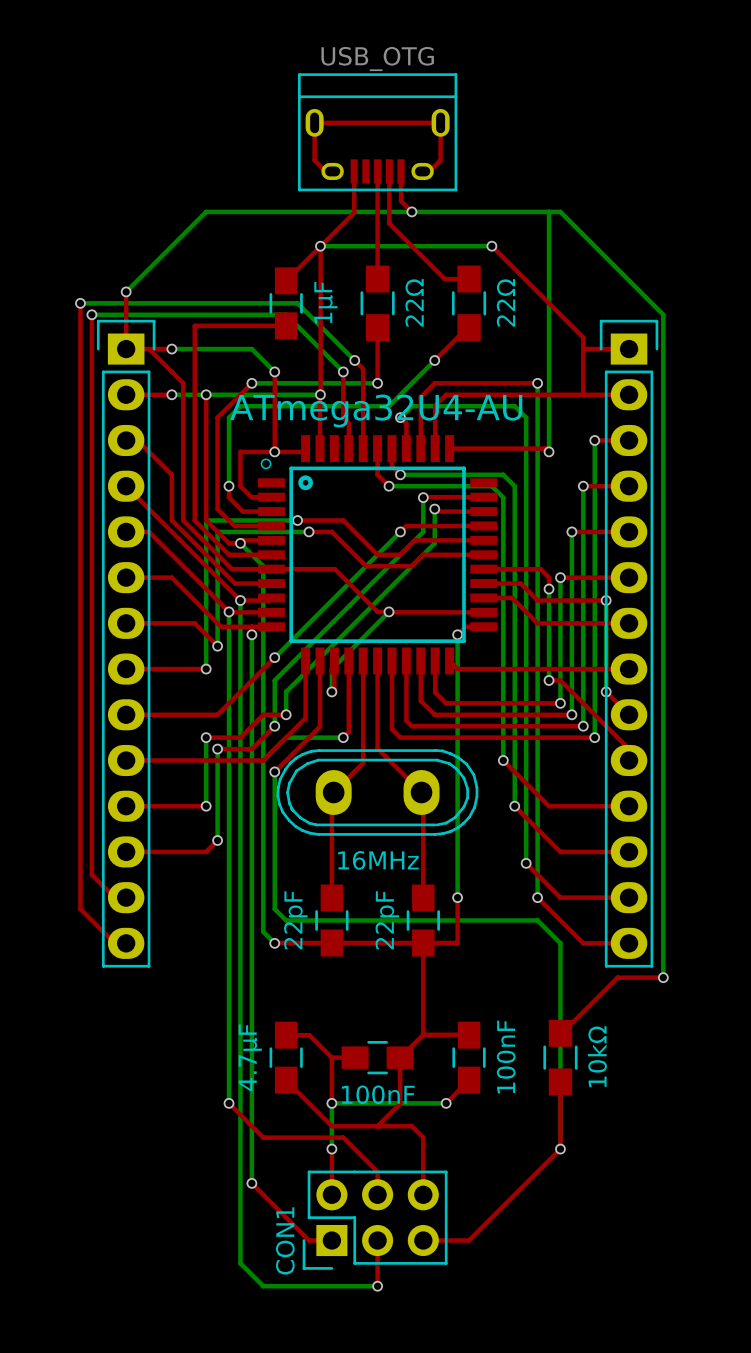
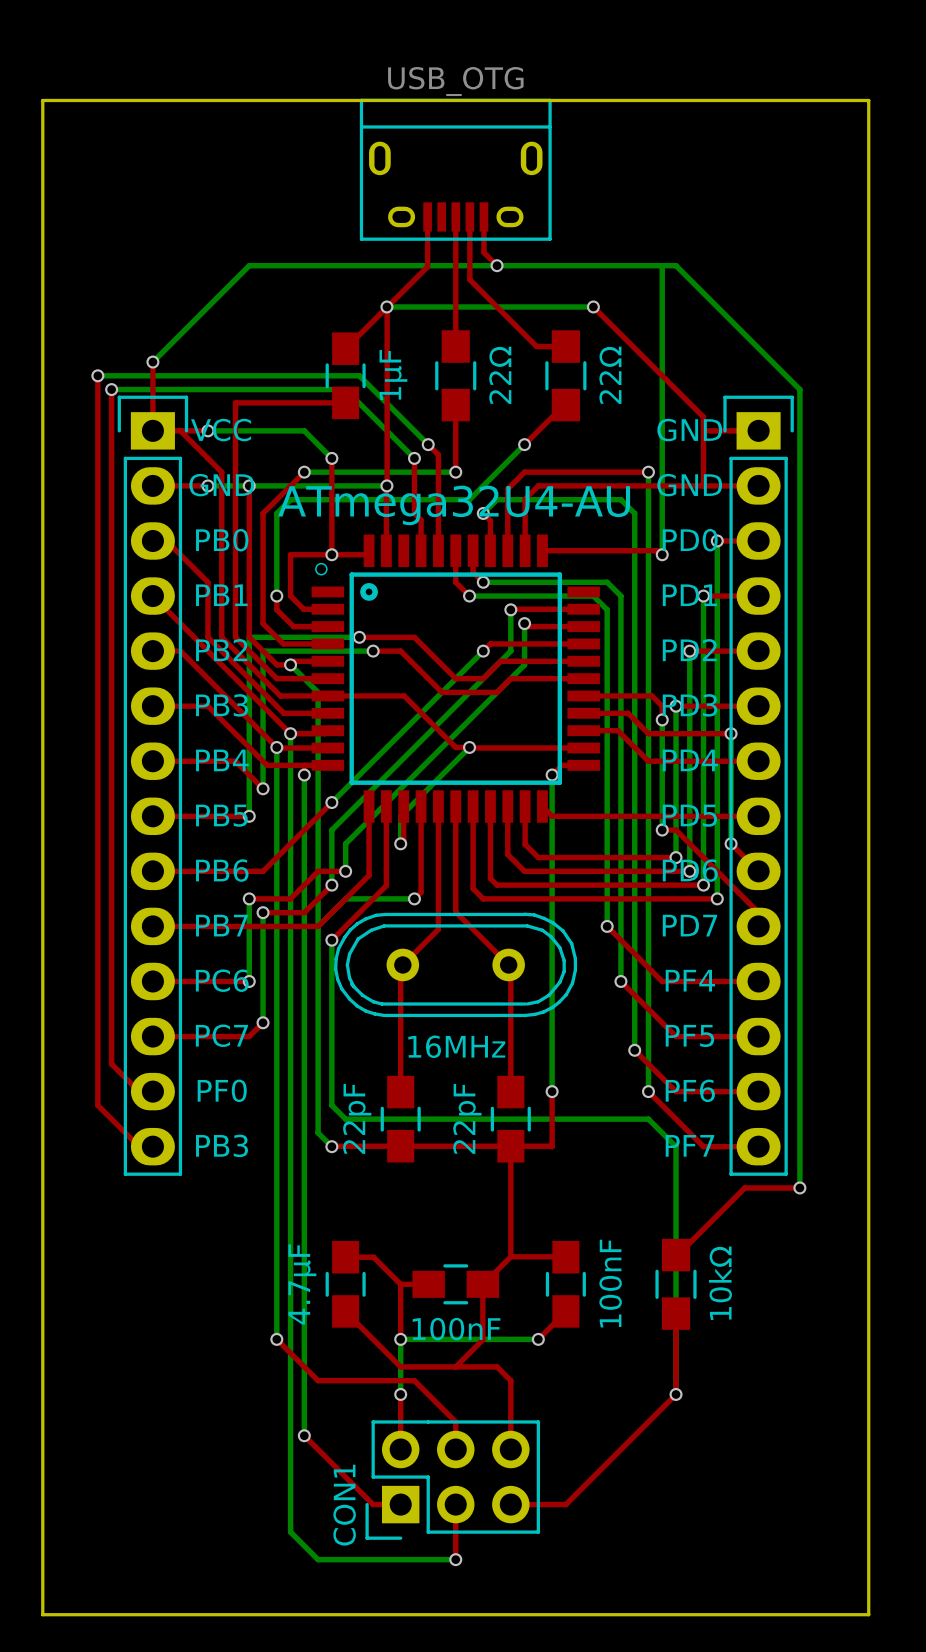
board edge: none -> (42, 100) (868, 100) (868, 1614) (42, 1614) (42, 100)
top track: (325, 171) (314, 160) (314, 122) (440, 122) (440, 160) (429, 171) -> none
text: none -> VCC (221, 430)
text: none -> GND (689, 430)
text: none -> GND (221, 485)
text: none -> GND (689, 485)
text: none -> PB0 (222, 540)
text: none -> PD0 (690, 540)
text: none -> PB1 (221, 595)
text: none -> PD1 (689, 595)
text: none -> PB2 (221, 650)
text: none -> PD2 (689, 650)
text: none -> PB3 (222, 705)
text: none -> PD3 (690, 705)
text: none -> PB4 (222, 760)
text: none -> PD4 (690, 760)
text: none -> PB5 (221, 815)
text: none -> PD5 (689, 815)
text: none -> PB6 (222, 870)
text: none -> PD6 (690, 870)
part footprint: [276, 749, 479, 836] -> [334, 912, 578, 1018]
text: none -> PB7 (221, 925)
text: none -> PD7 (689, 925)
text: none -> PC6 (222, 980)
text: none -> PF4 (690, 980)
text: none -> PC7 (221, 1035)
text: none -> PF5 (689, 1035)
text: none -> PF0 (222, 1090)
text: none -> PF6 (690, 1090)
text: none -> PB3 (222, 1145)
text: none -> PF7 (689, 1145)

